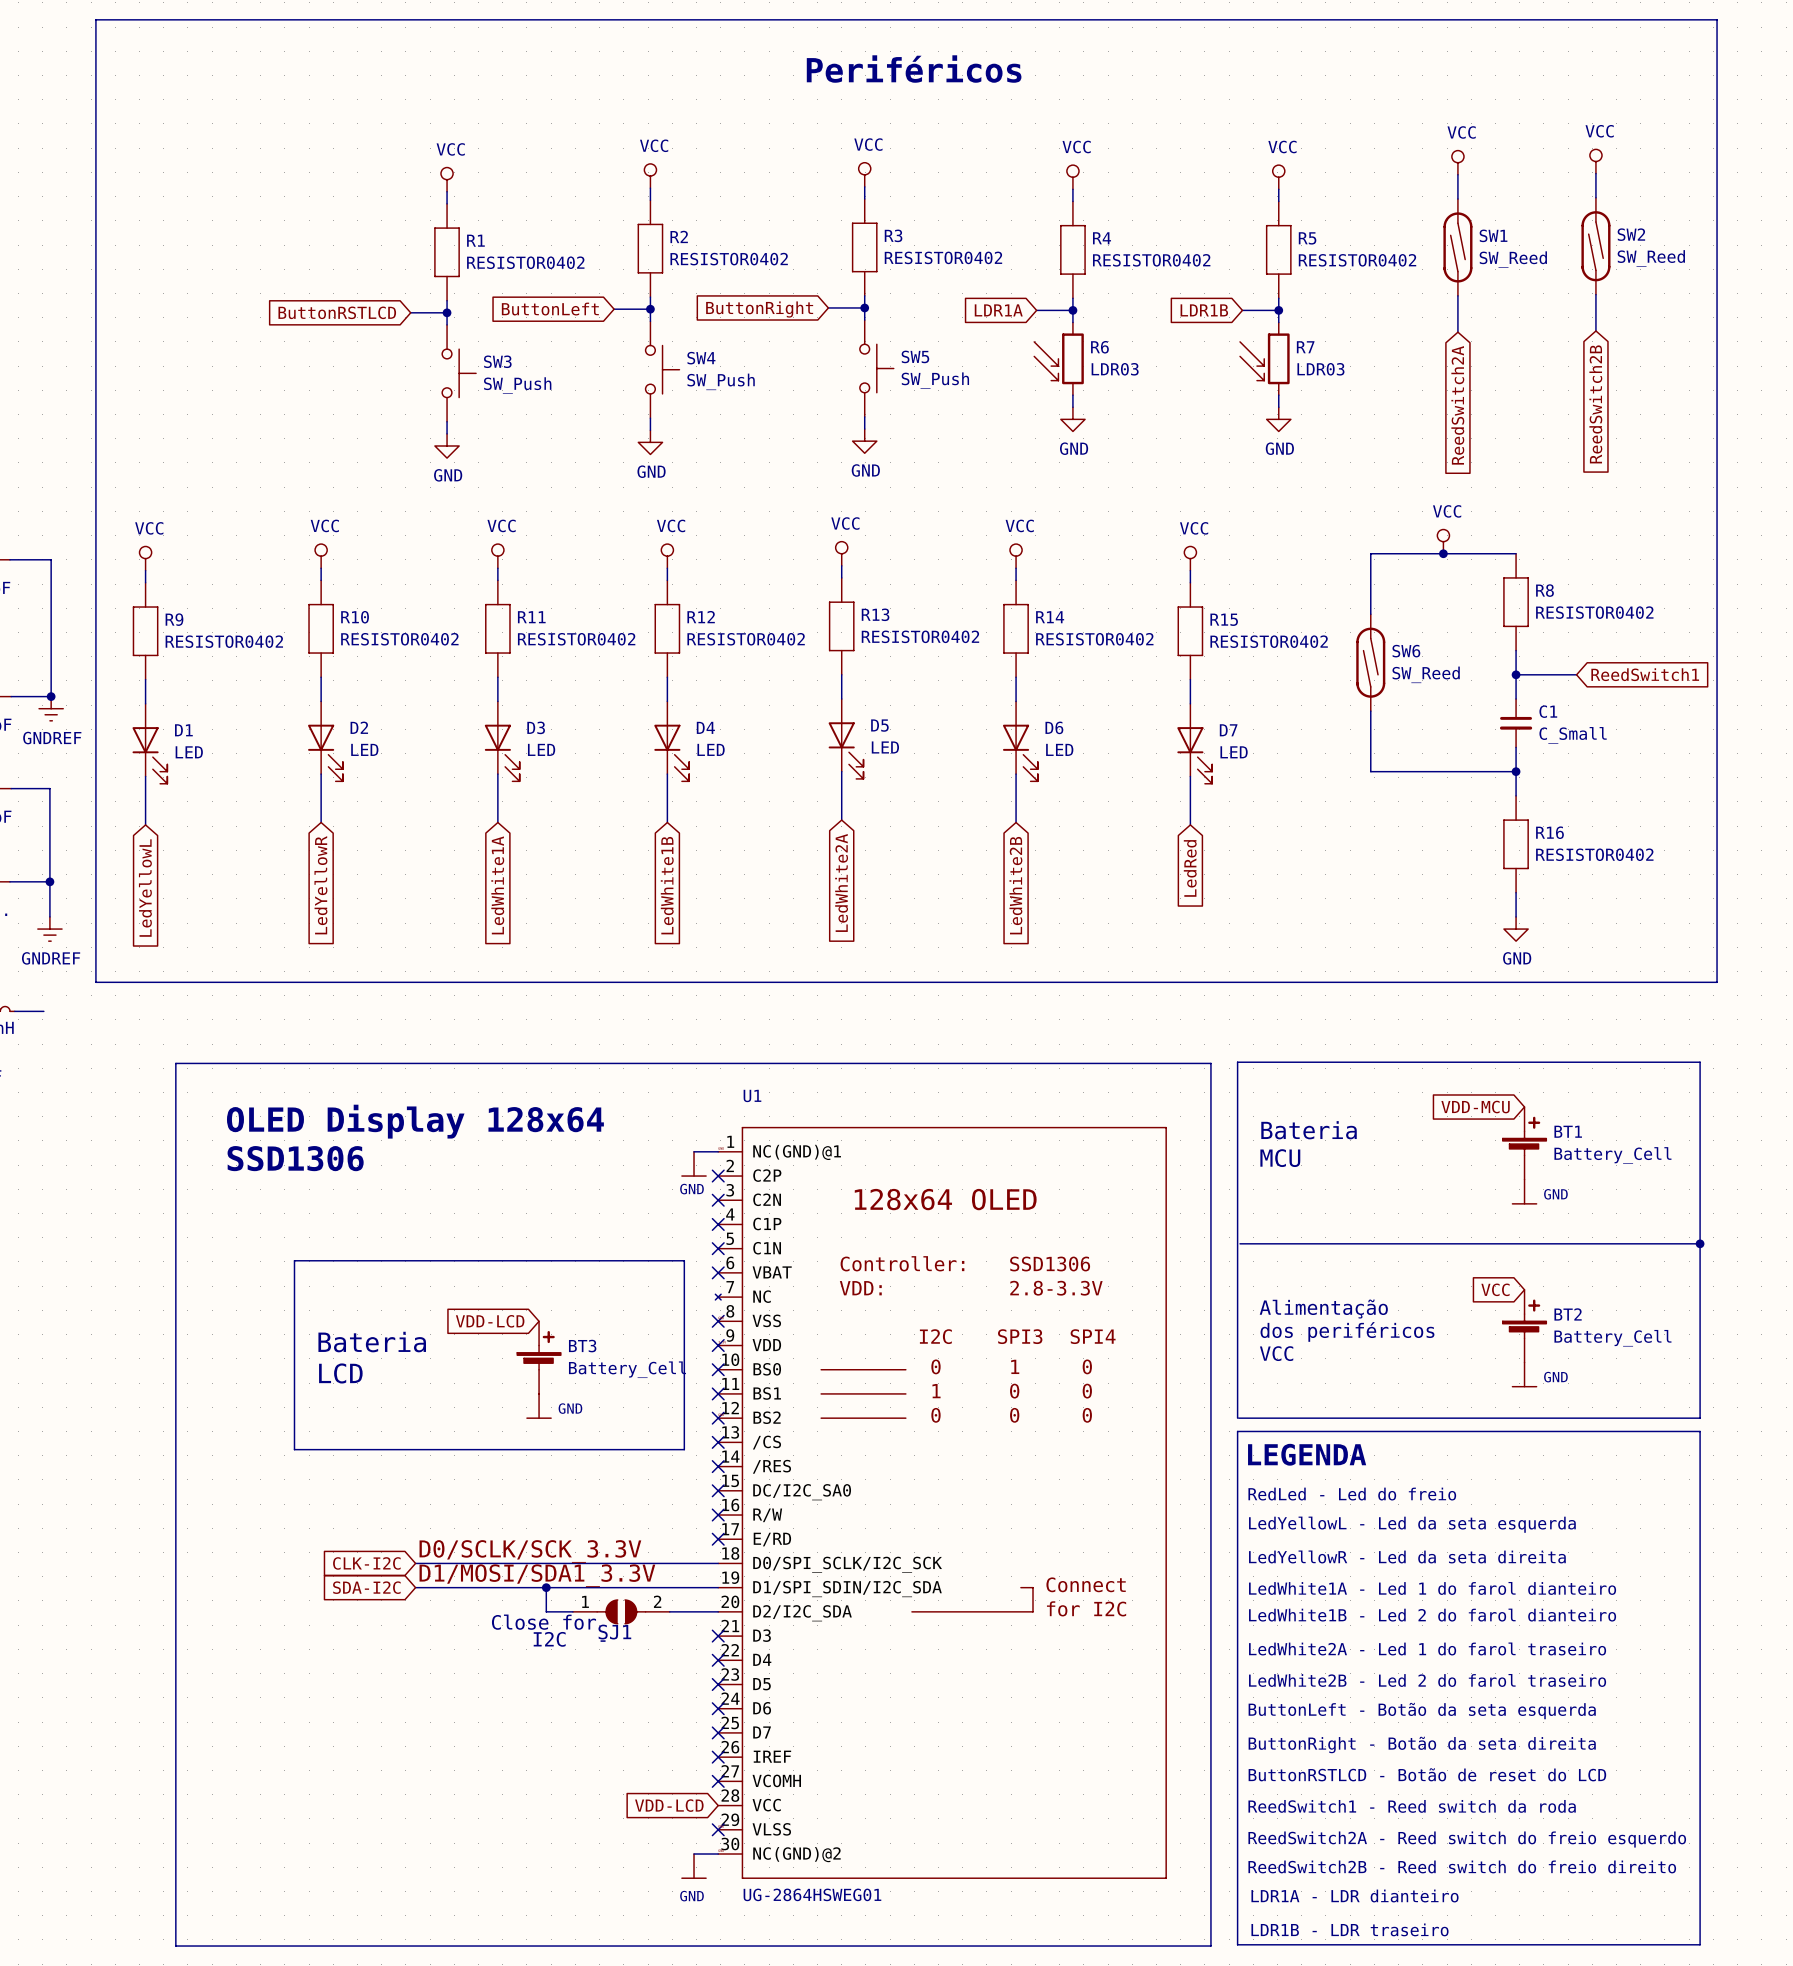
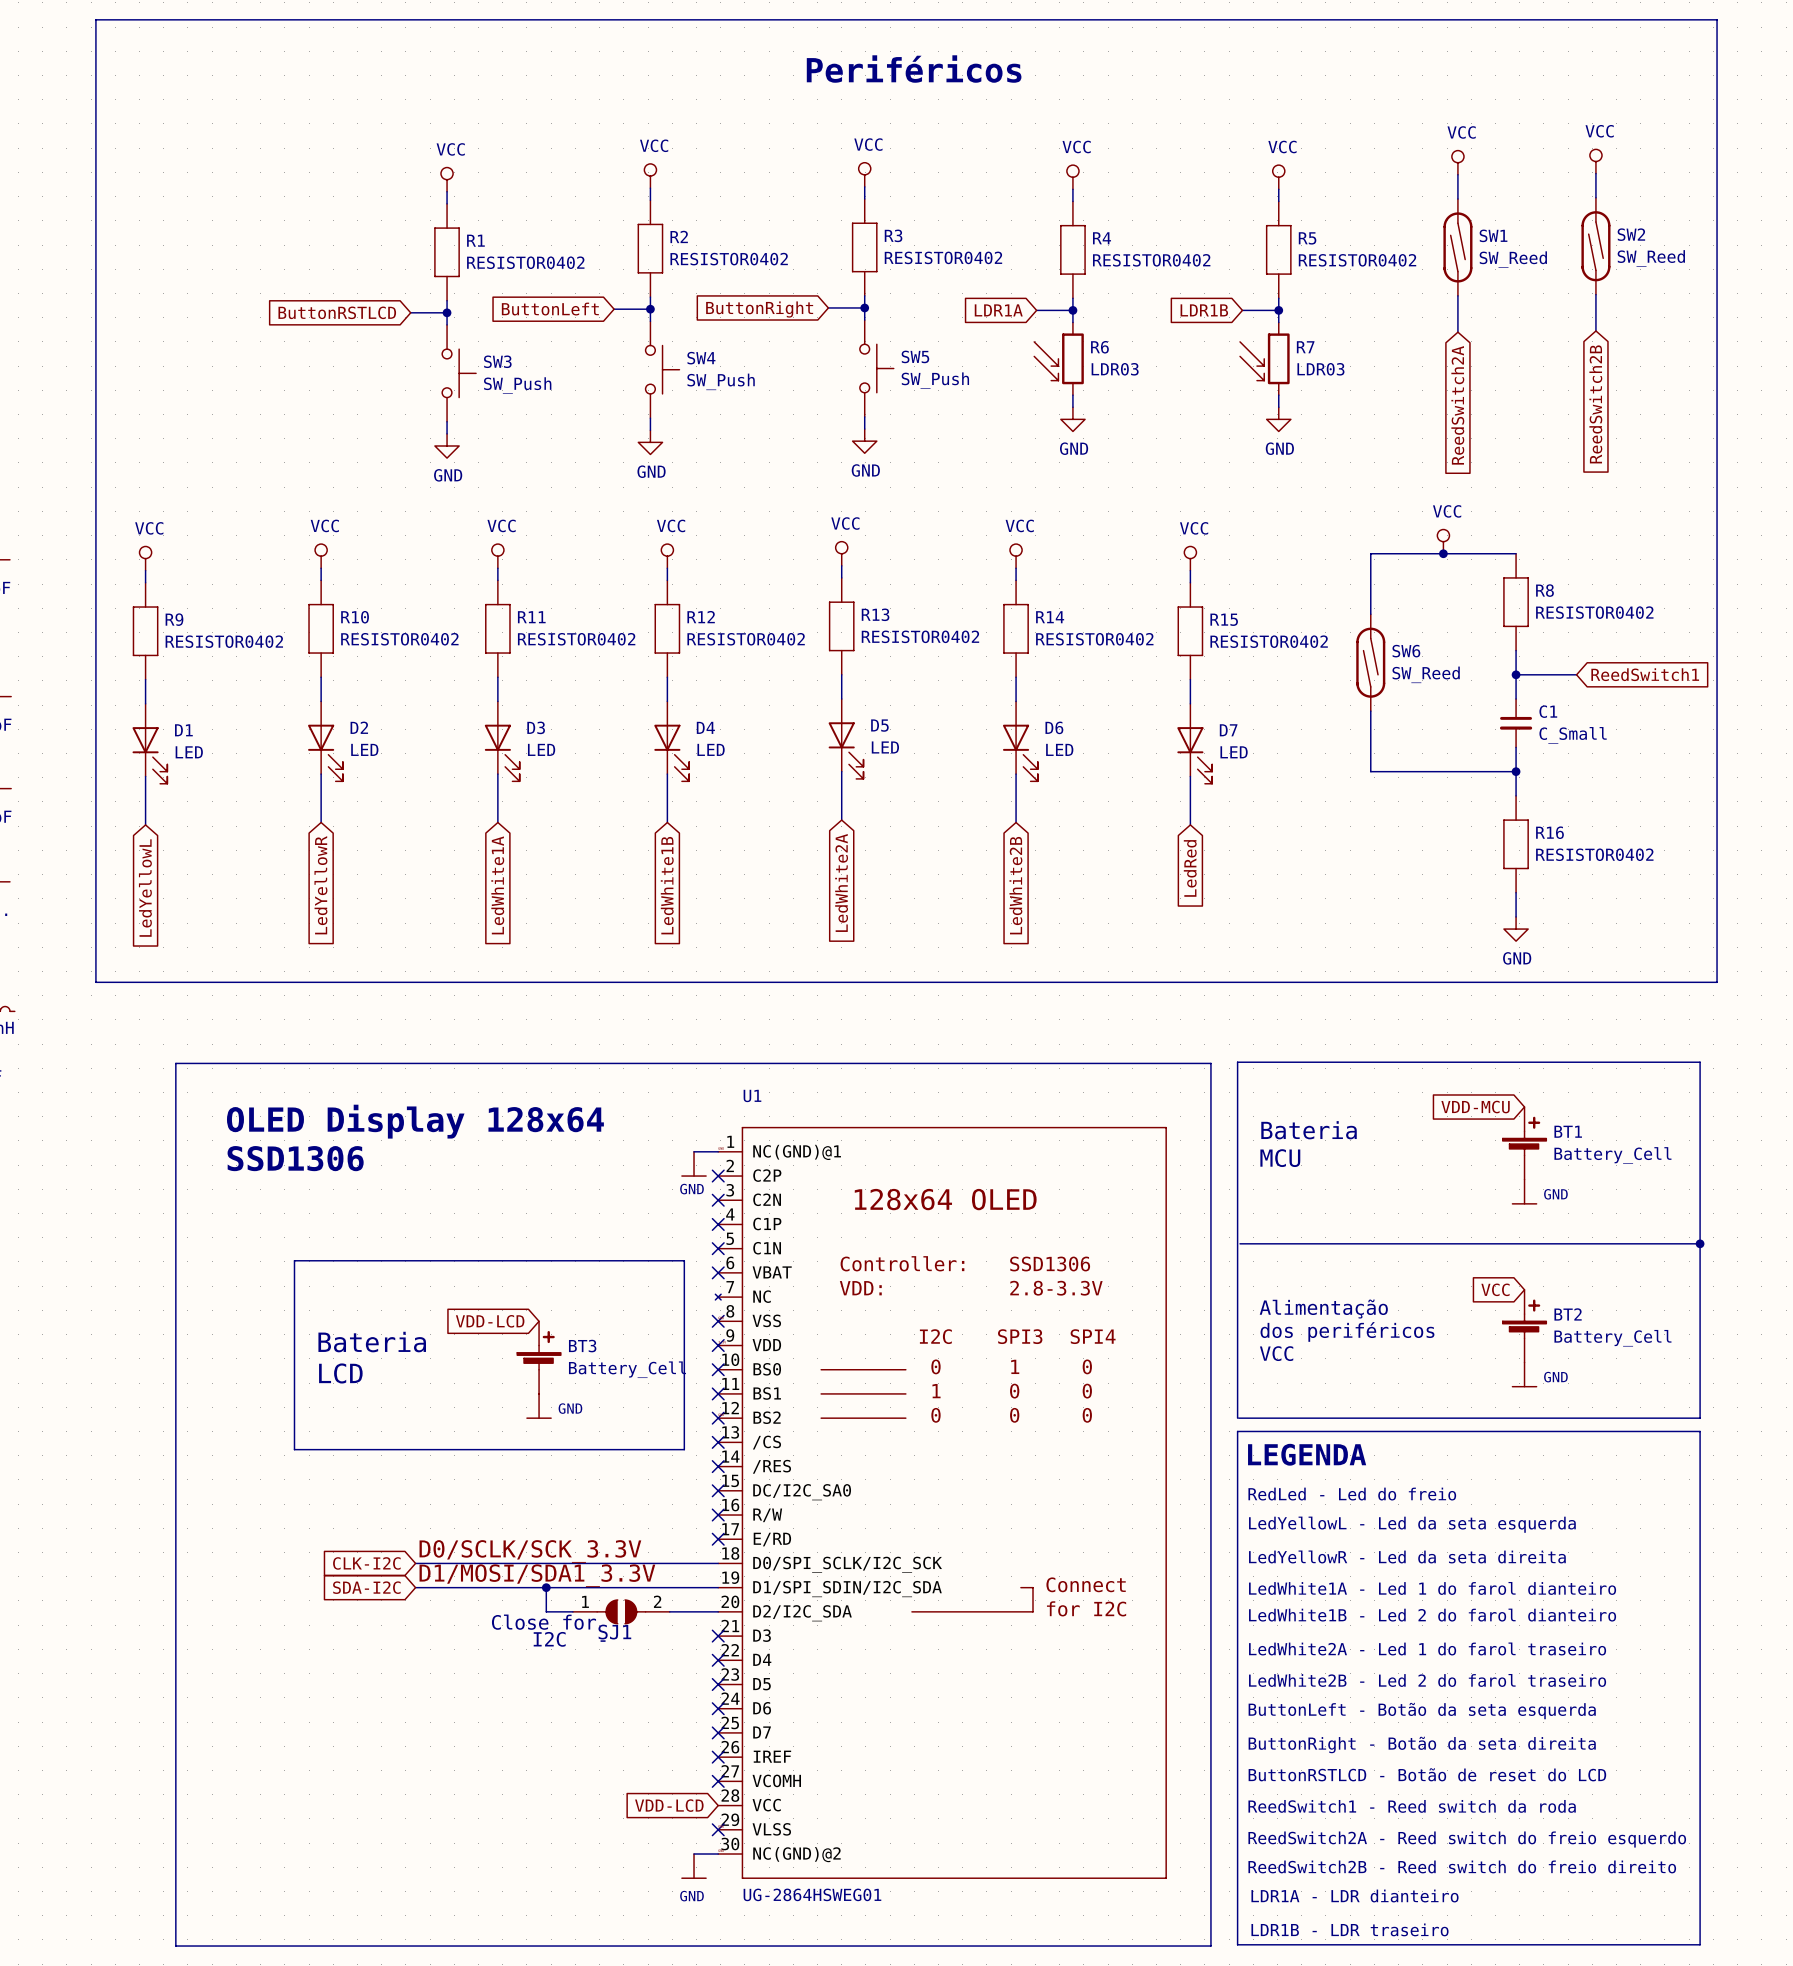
wire: (9, 559) (51, 559) (51, 696) (11, 696) -> none
junction: (51, 696) -> none
power symbol: GNDREF (51, 708) -> none
wire: (11, 788) (49, 788) (49, 916) -> none
wire: (9, 881) (49, 881) -> none
junction: (49, 881) -> none
power symbol: GNDREF (49, 929) -> none
wire: (14, 1011) (43, 1011) -> none

